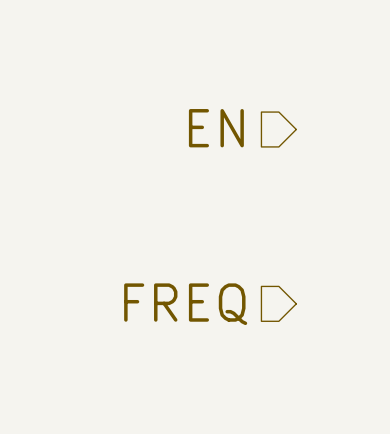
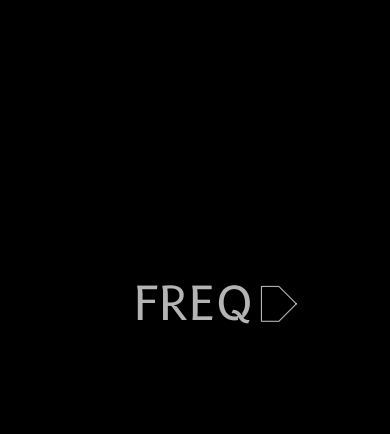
hierarchical label: EN (216, 128) -> none

